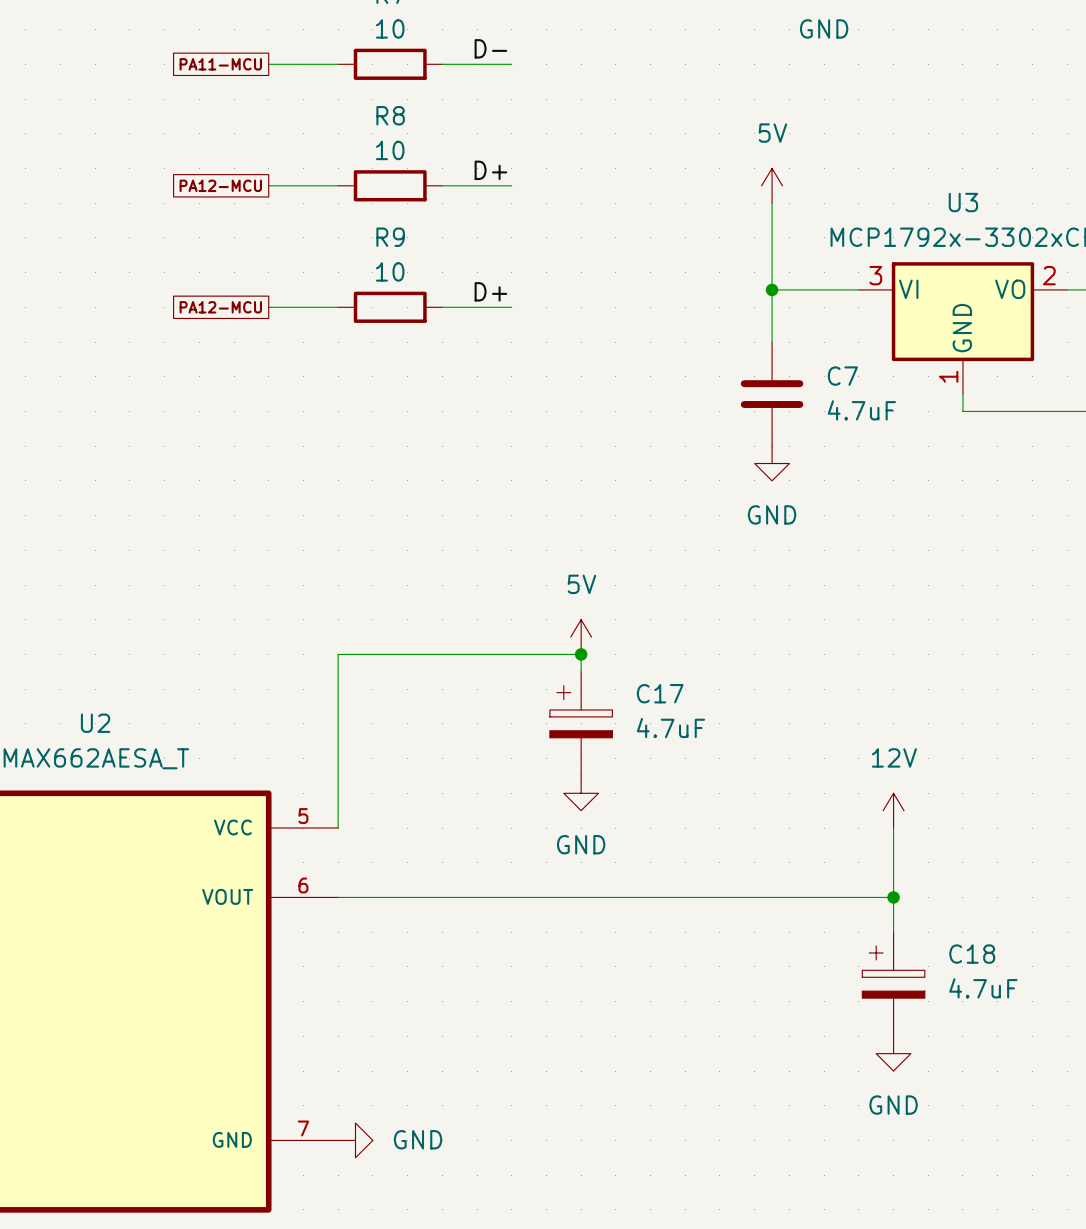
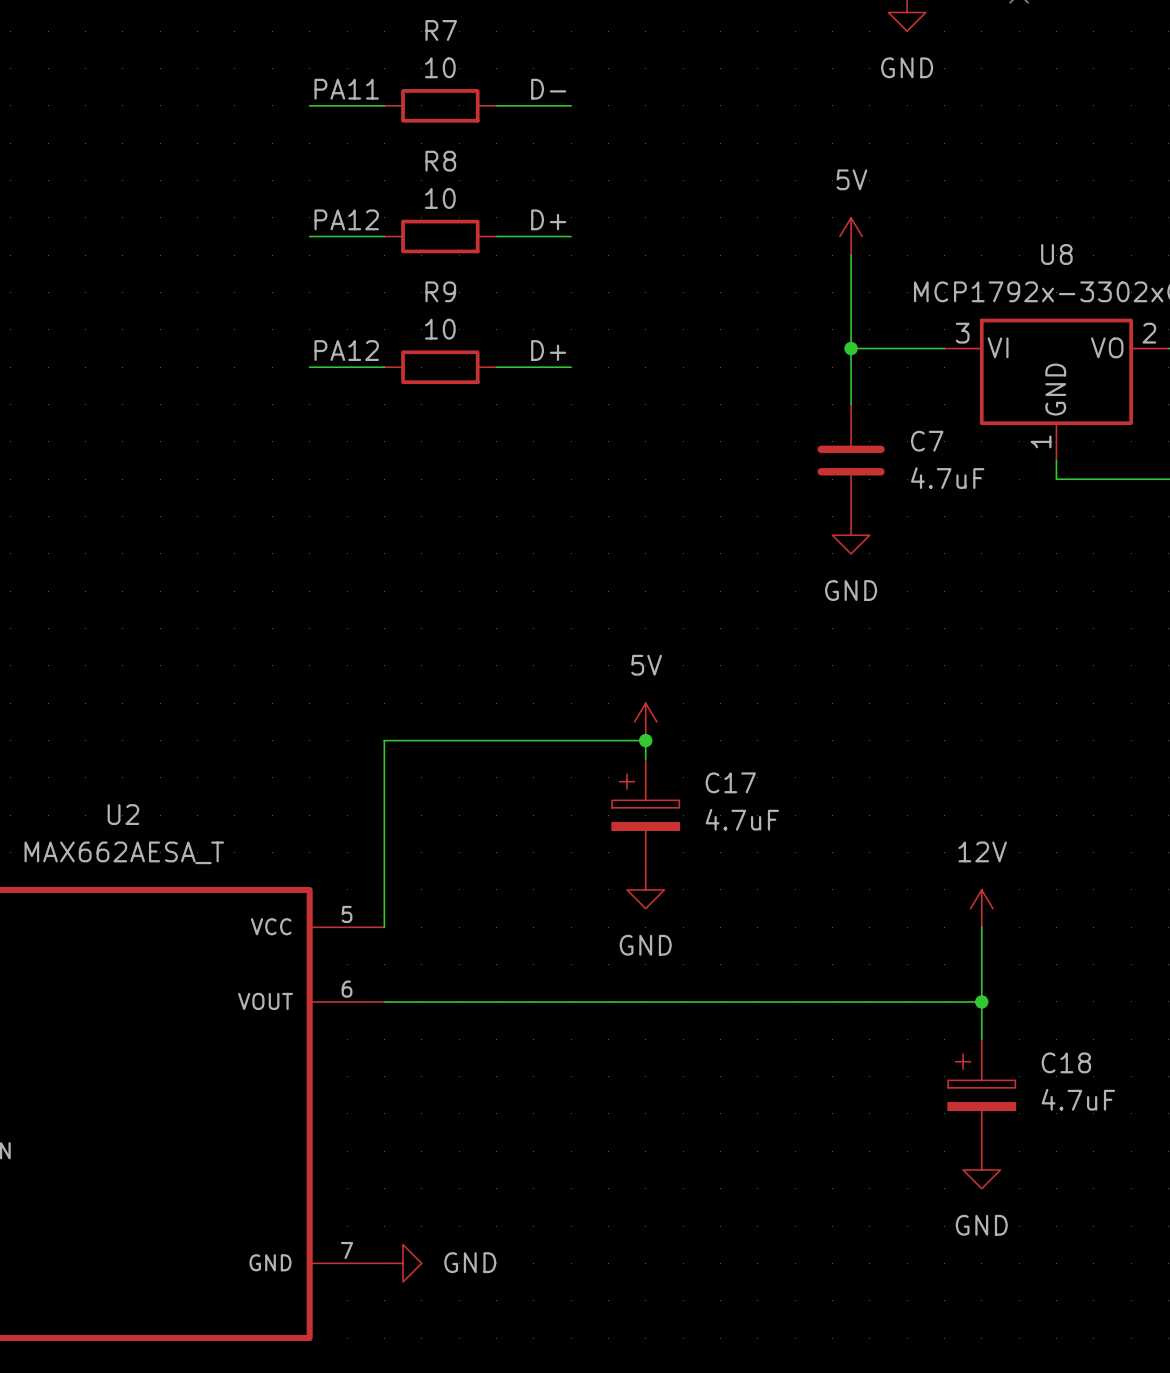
label: none -> PA11 (346, 89)
global label: PA11-MCU (220, 64) -> none
label: none -> PA12 (346, 219)
global label: PA12-MCU (220, 185) -> none
U3 name: U3 (963, 202) -> U8 (1056, 254)
label: none -> PA12 (346, 350)
global label: PA12-MCU (220, 307) -> none

